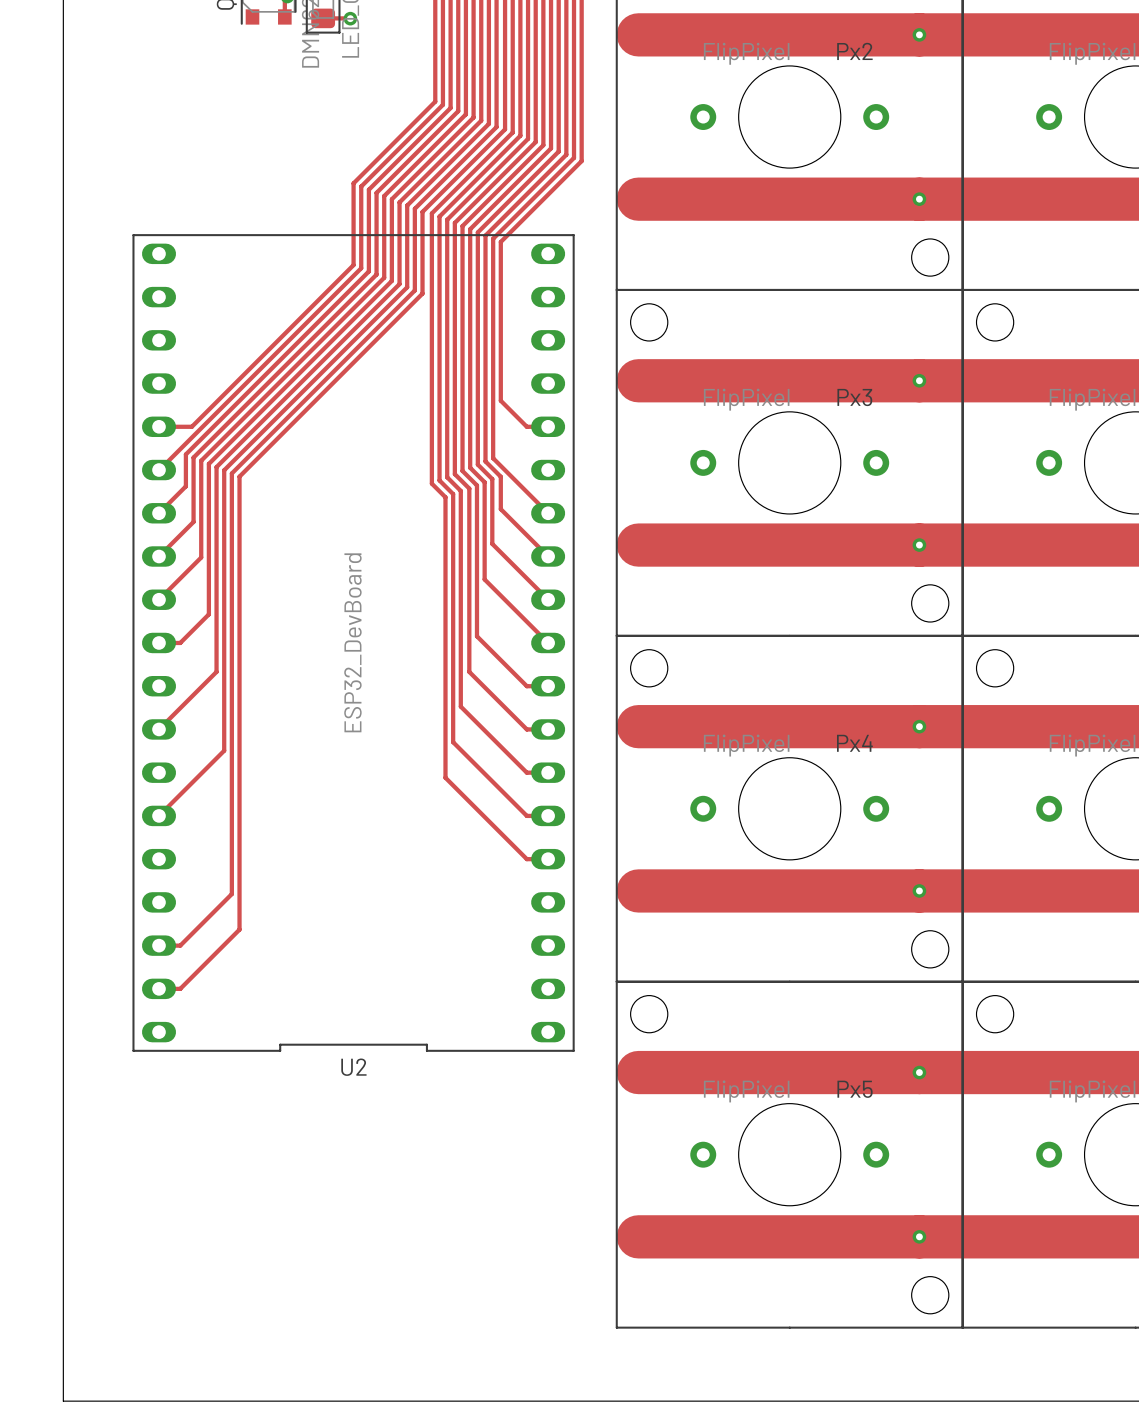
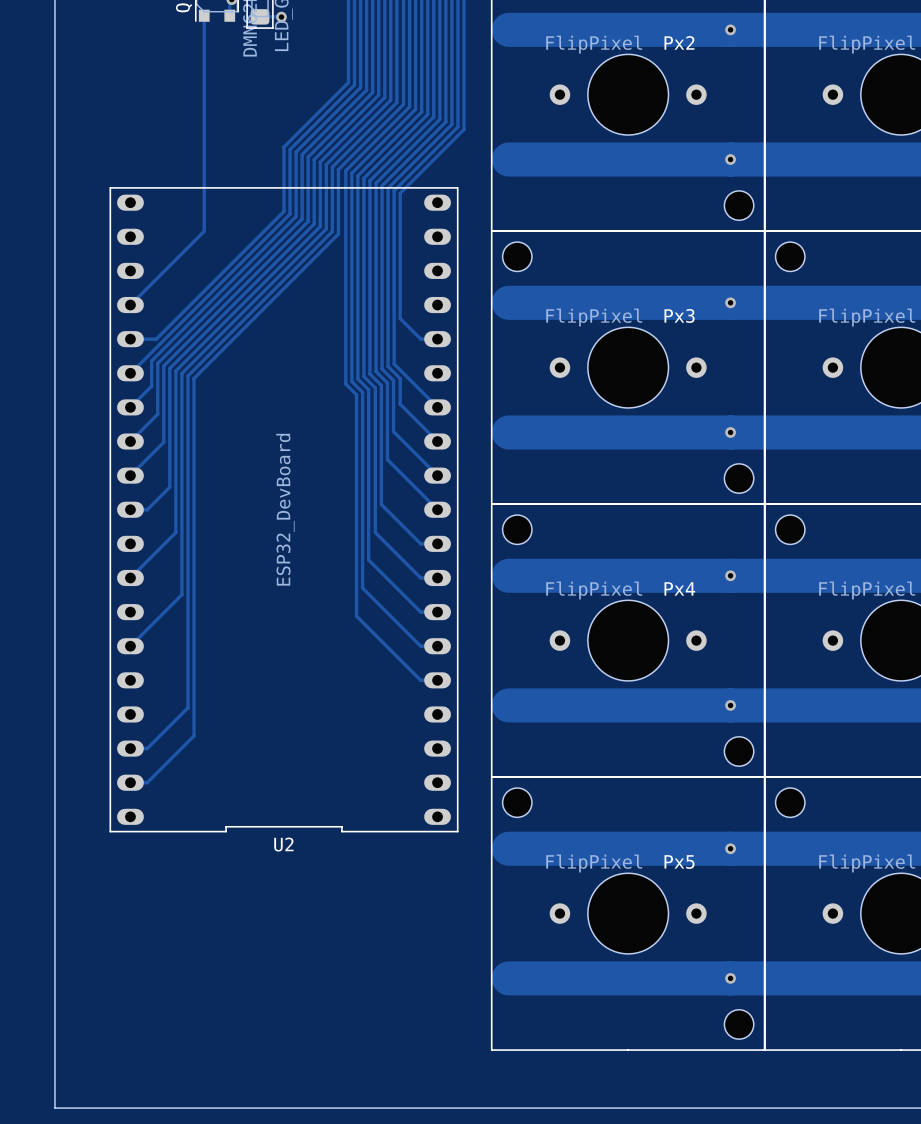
track: none -> (204, 15) (204, 231) (130, 305)

